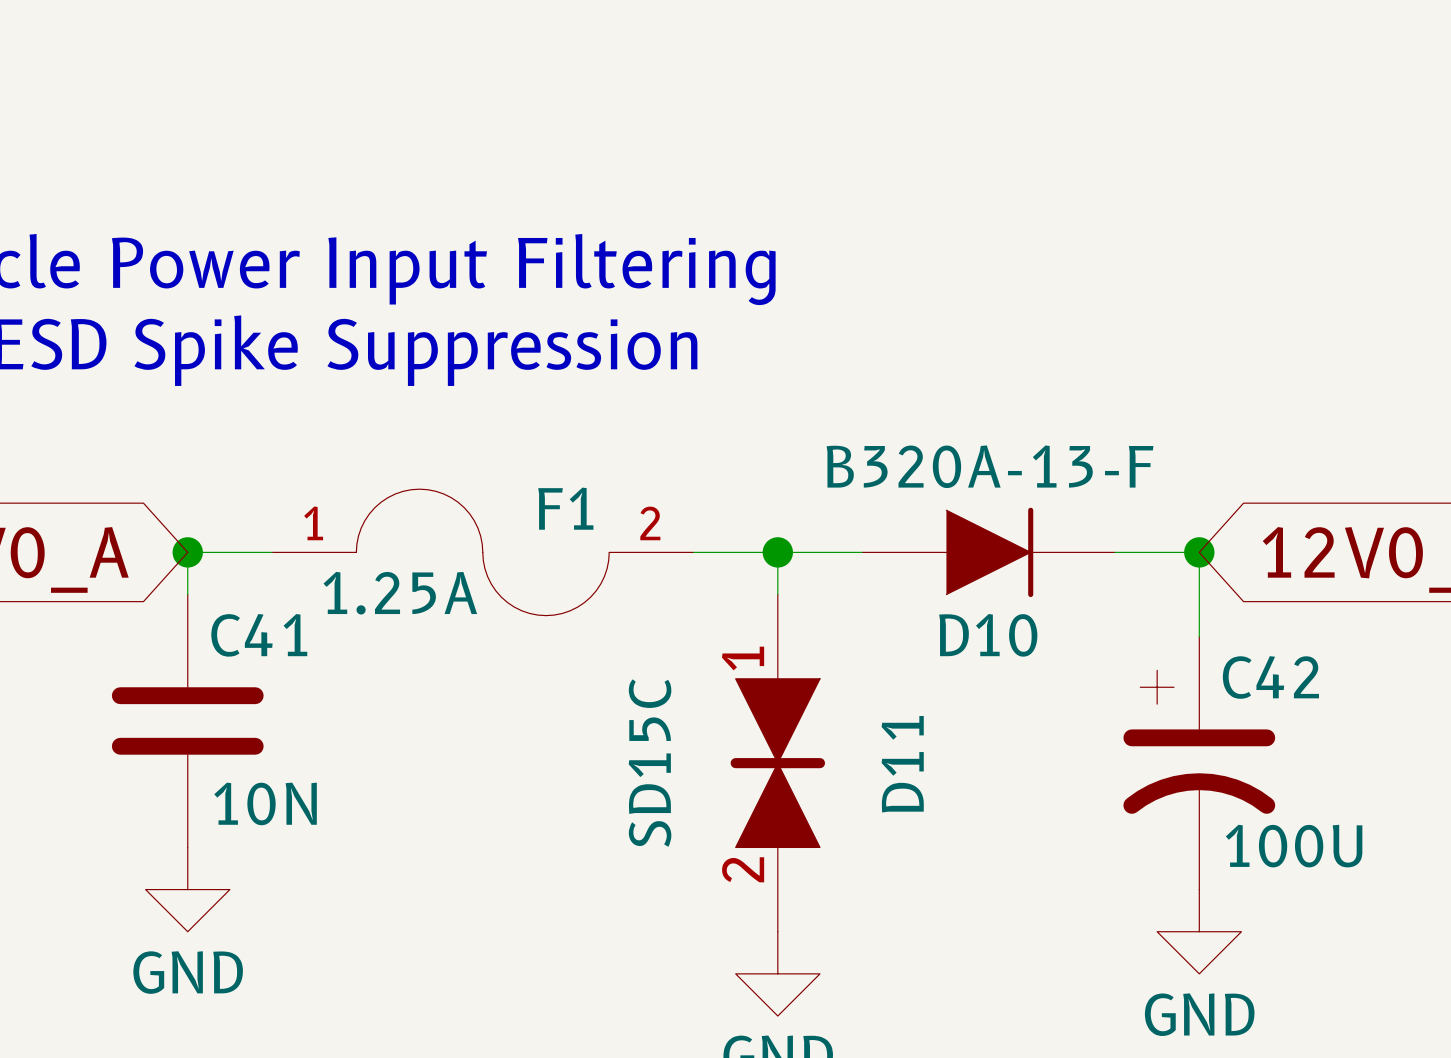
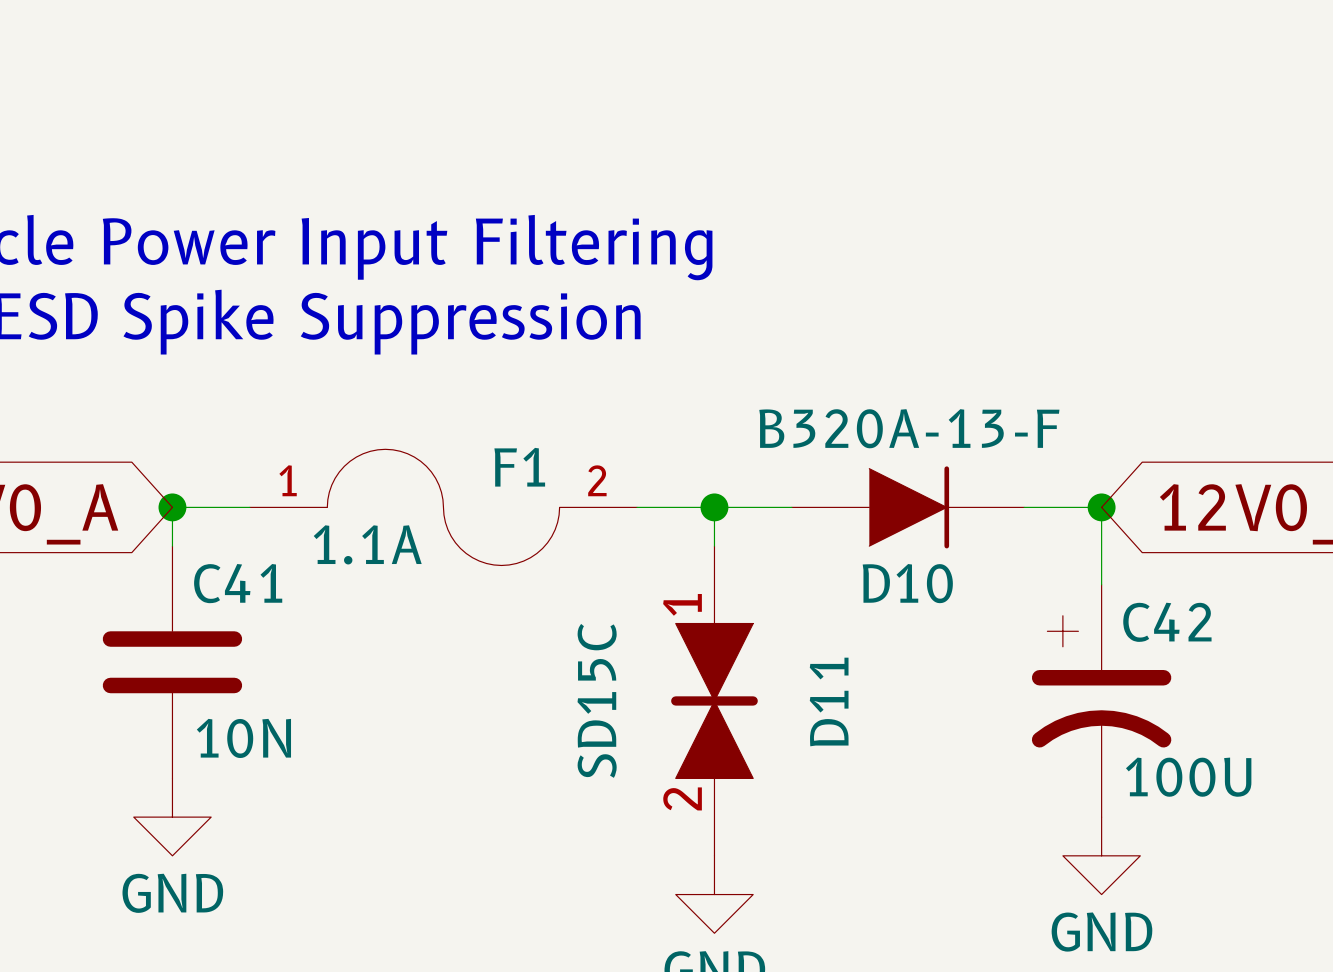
F1 value: 1.25A (400, 593) -> 1.1A (367, 544)

